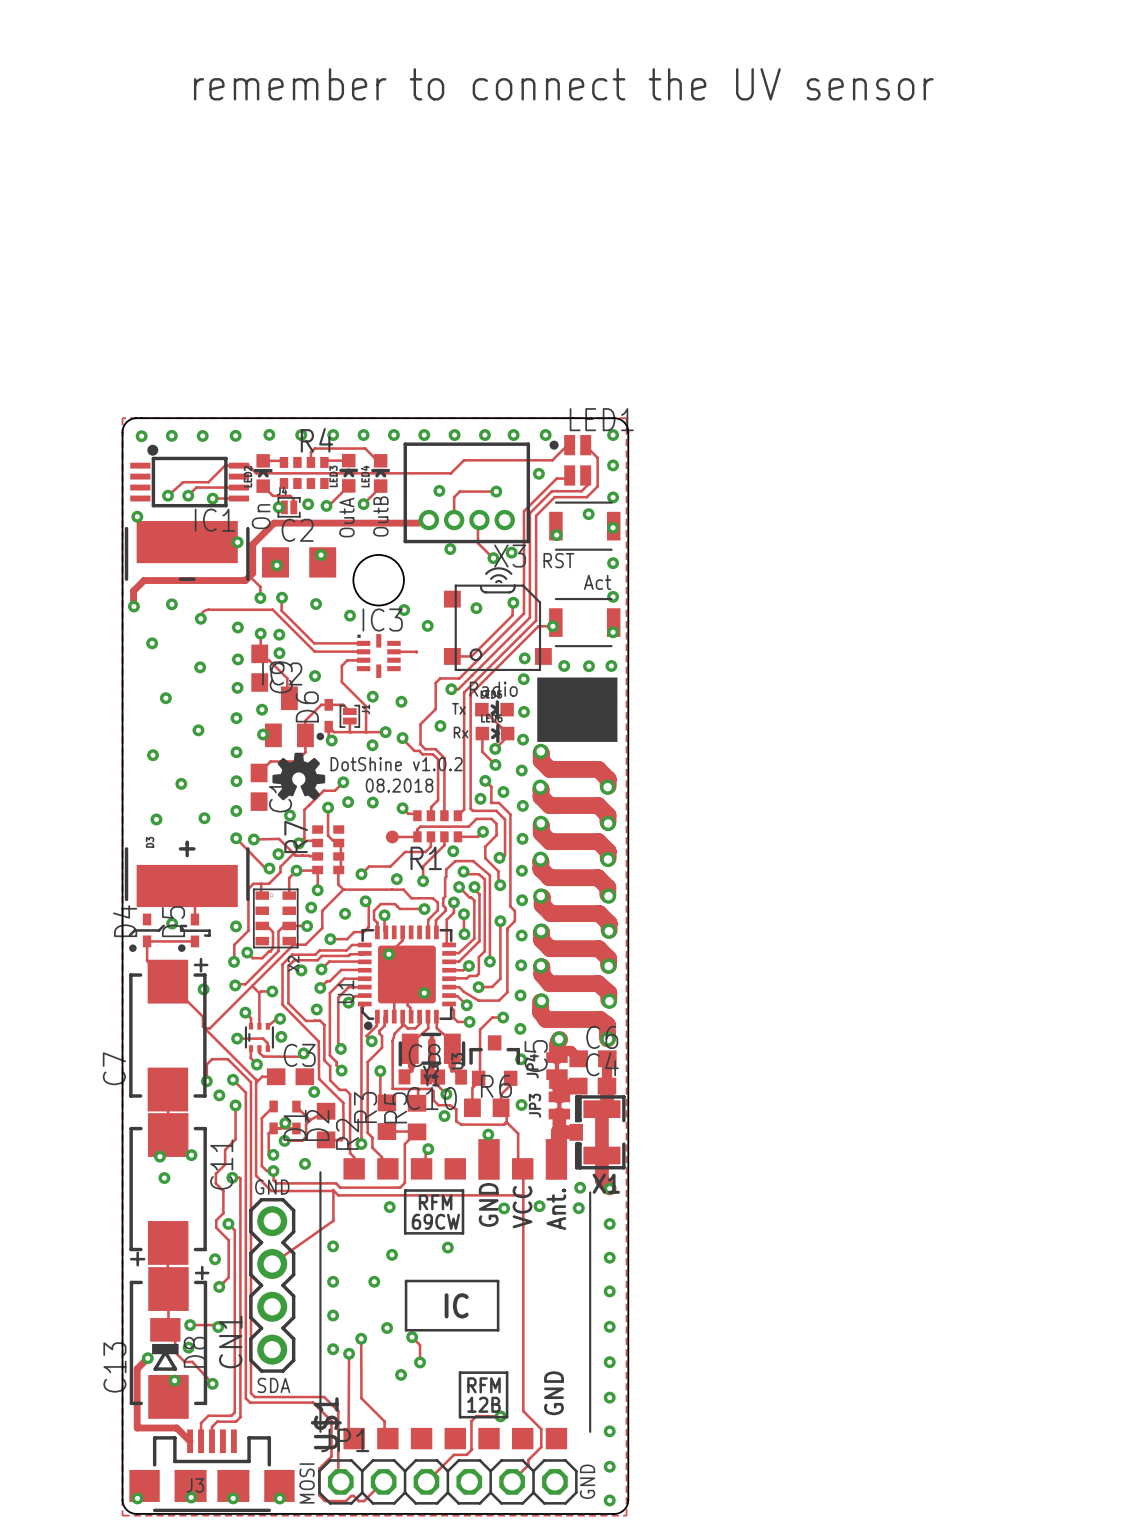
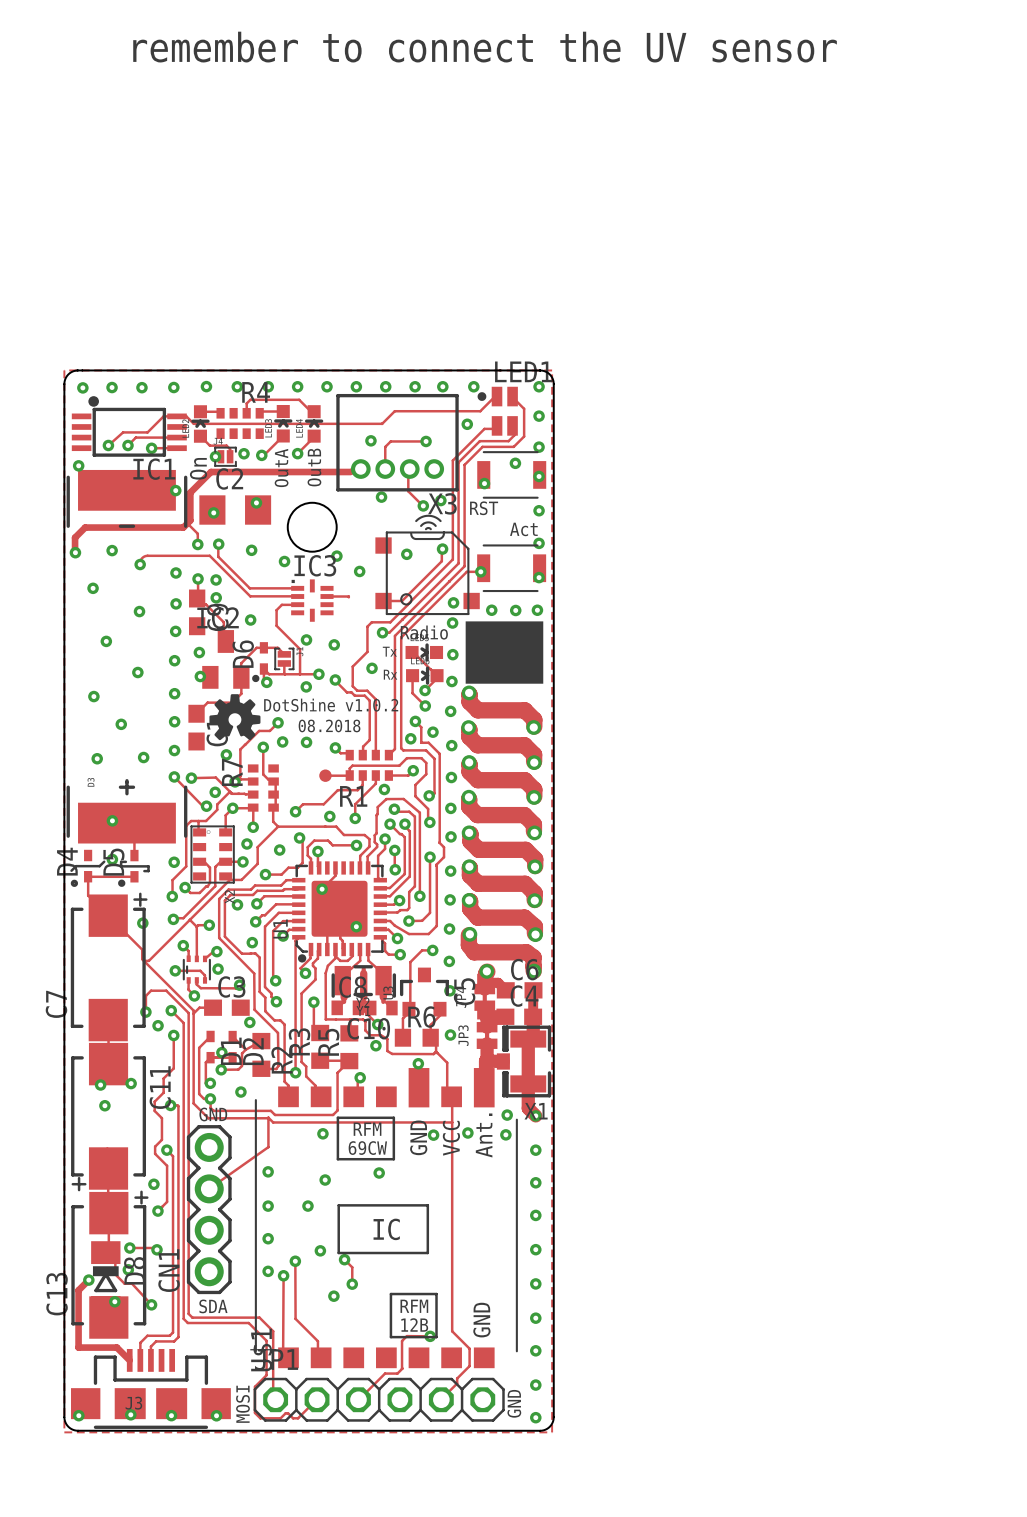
via: none -> (112, 820)

